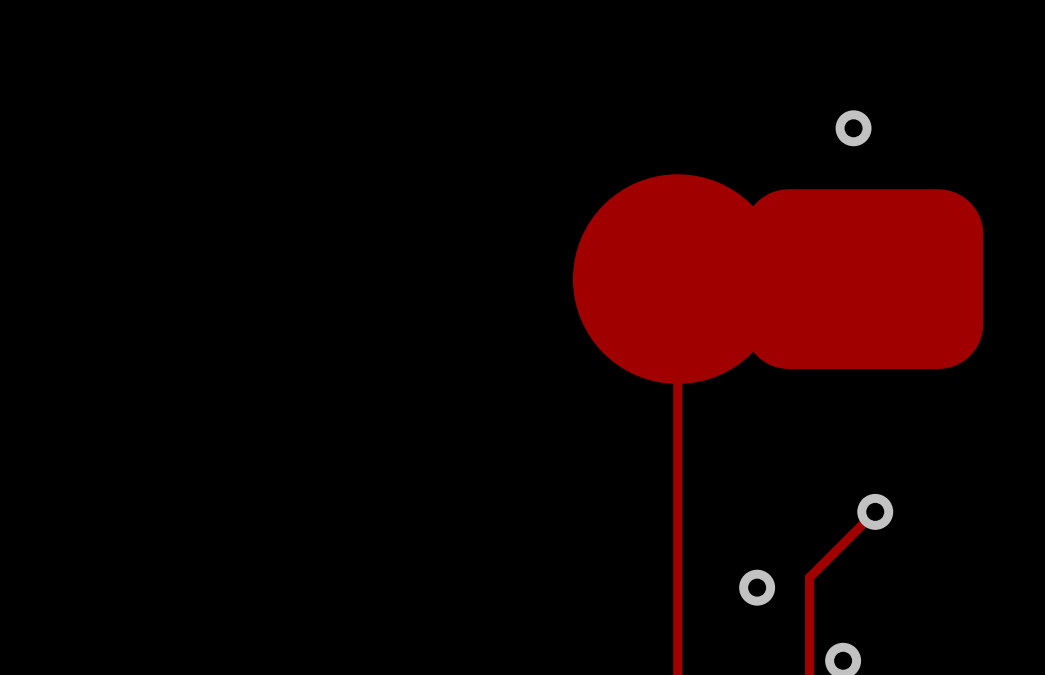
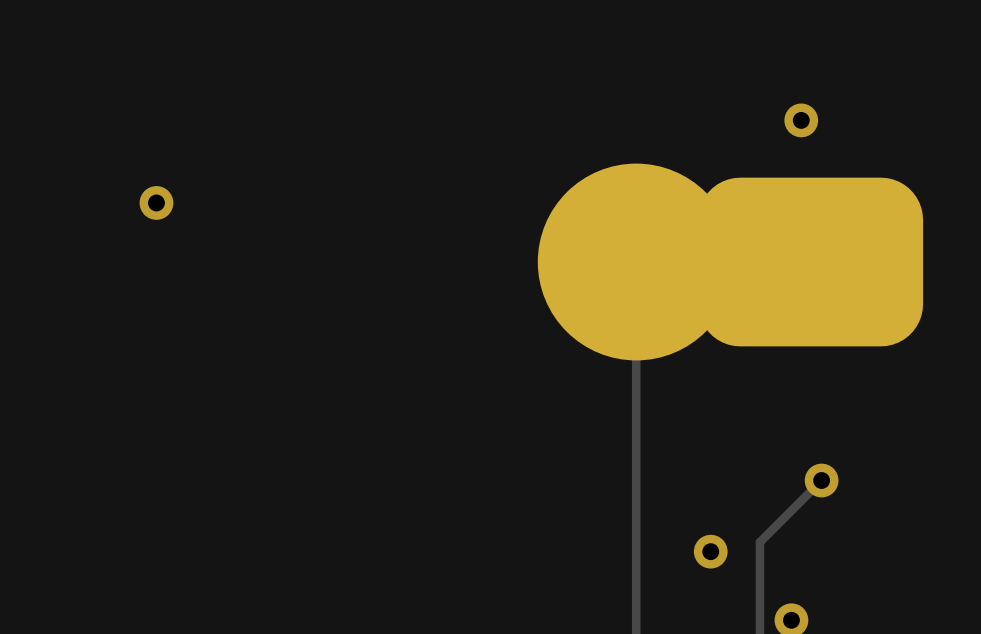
via: none -> (156, 202)

